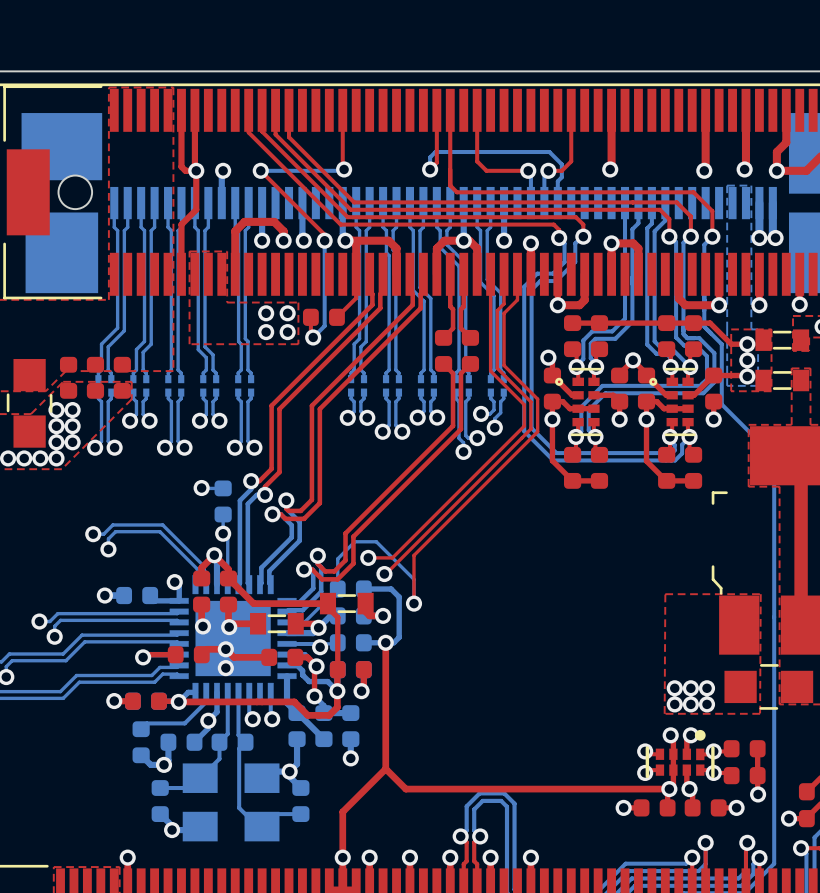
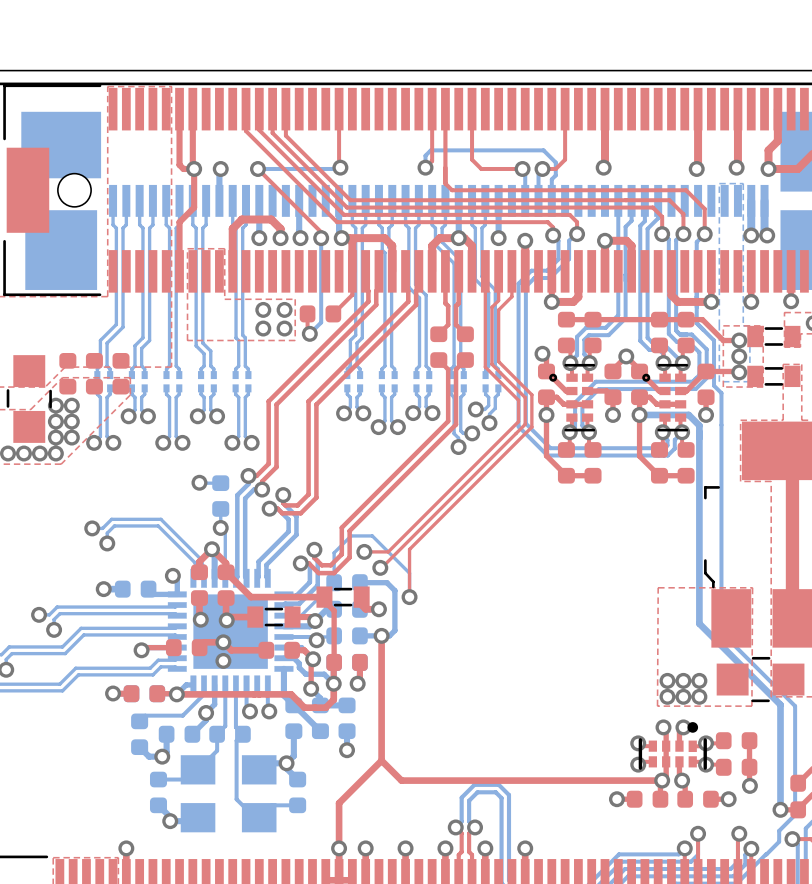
bottom track: (721, 389) (721, 404) (774, 456) (774, 863) -> (714, 385) (721, 393) (721, 632) (795, 706) (795, 814) (779, 830) (779, 841) (765, 854)
bottom track: none -> (639, 414) (688, 414) (699, 425) (699, 623) (780, 704) (780, 809)

